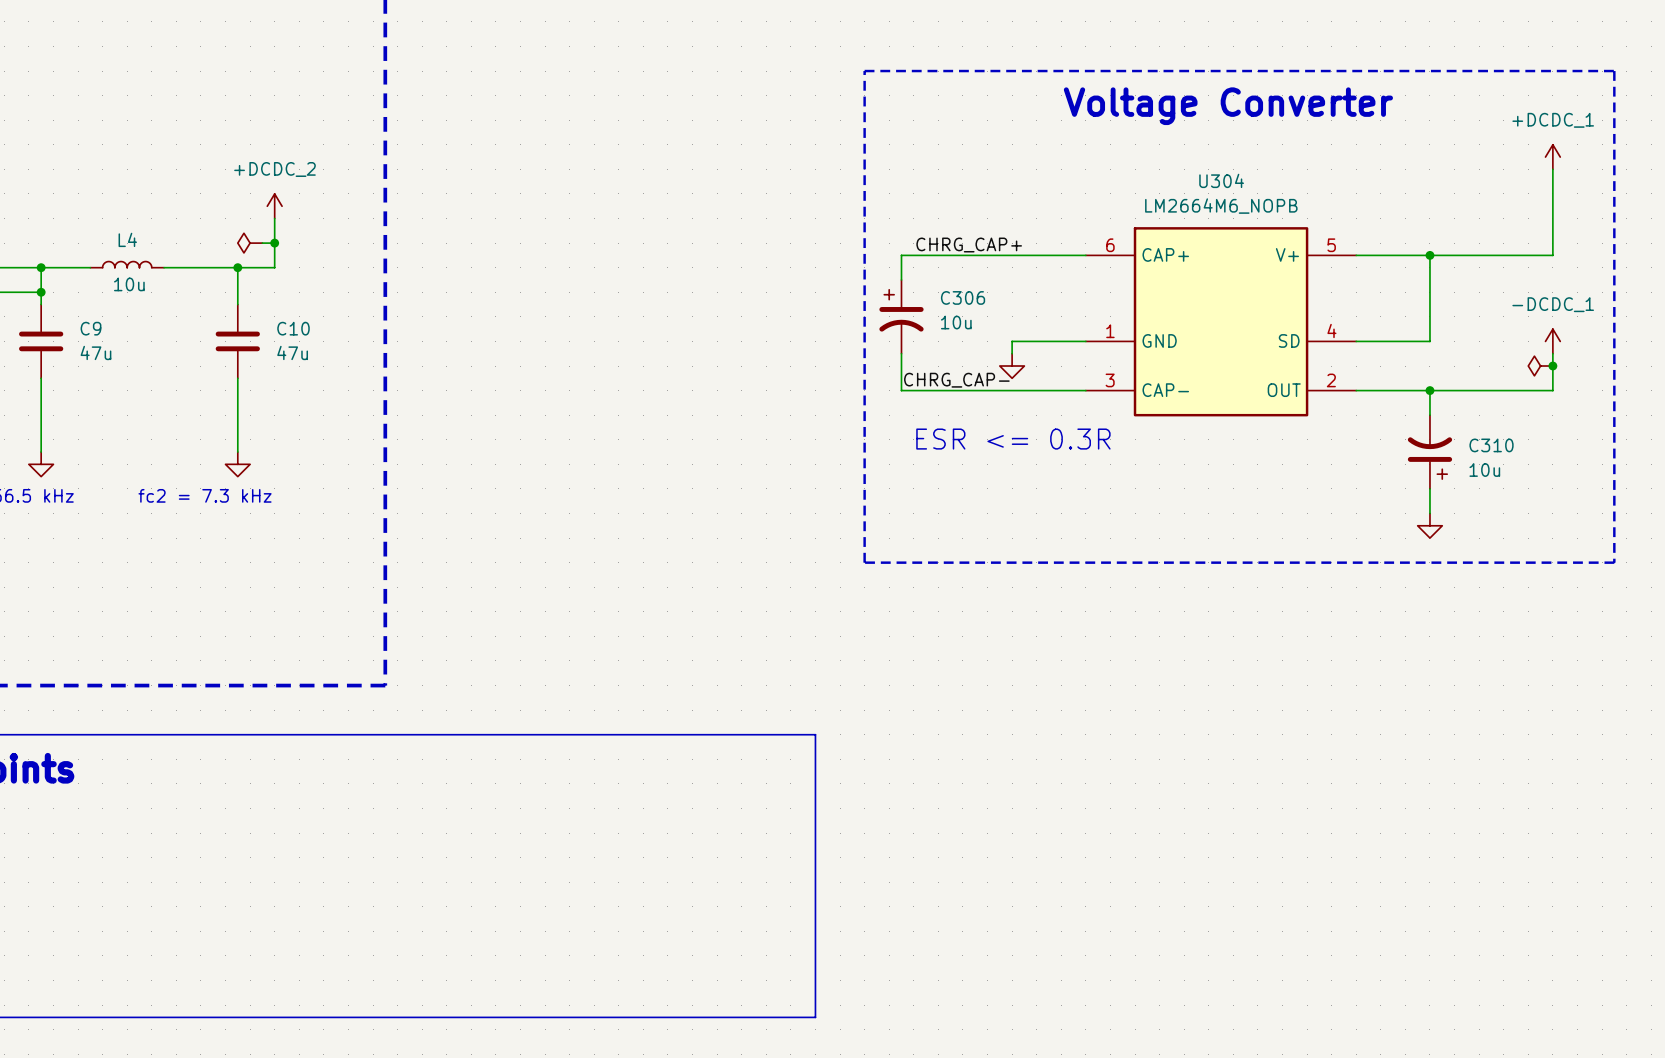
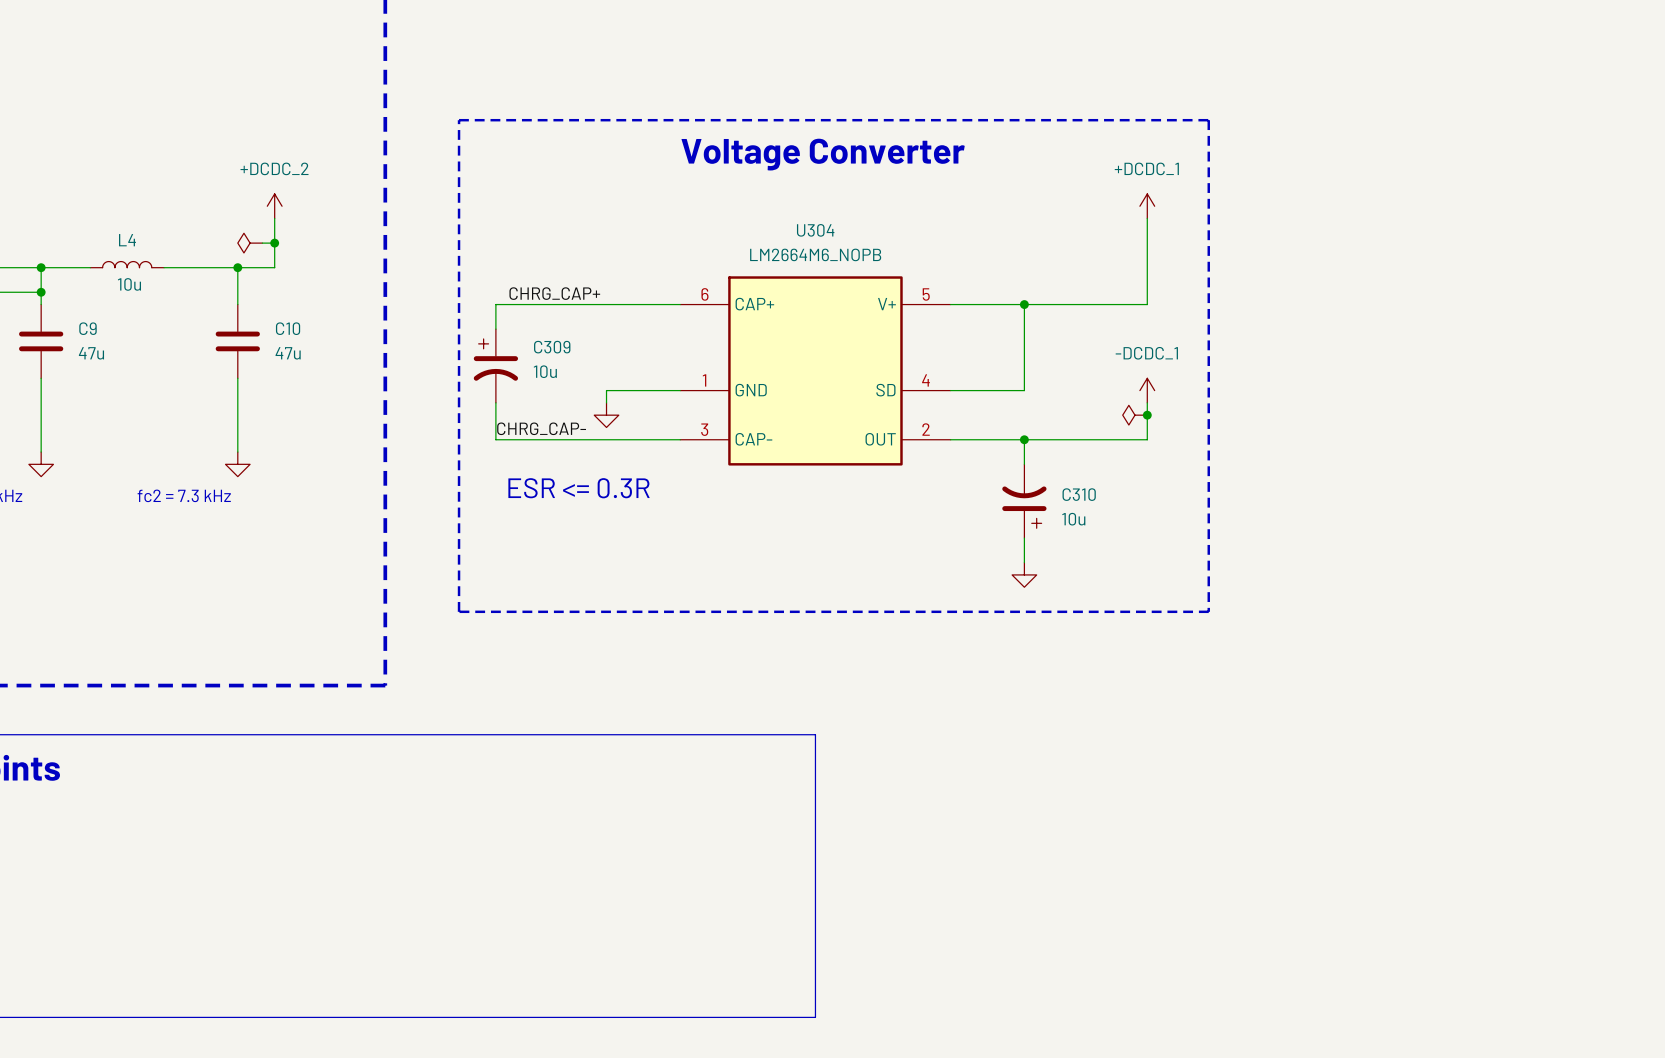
line: (864, 71) (1614, 71) (1614, 562) (864, 562) (864, 71) -> none
text: Voltage Converter (1228, 106) -> none
line: none -> (459, 120) (1208, 120) (1208, 611) (459, 611) (459, 120)
text: none -> Voltage Converter (823, 154)
power symbol: +DCDC_1 (1552, 157) -> none
wire: (1552, 169) (1552, 255) (1356, 255) -> none
power symbol: none -> +DCDC_1 (1147, 206)
wire: none -> (1147, 218) (1147, 304) (950, 304)
label: CHRG_CAP+ (969, 245) -> none
wire: (1085, 255) (901, 255) (901, 279) -> none
wire: (1429, 255) (1429, 341) (1356, 341) -> none
junction: (1429, 255) -> none
label: none -> CHRG_CAP+ (554, 293)
wire: none -> (680, 304) (495, 304) (495, 329)
junction: none -> (1024, 304)
C306: 10u (901, 316) -> none
U304 position: (1221, 321) -> (815, 370)
wire: (1085, 341) (1012, 341) (1012, 353) -> none
power symbol: -DCDC_1 (1552, 341) -> none
wire: (1552, 353) (1552, 390) (1356, 390) -> none
C309: none -> 10u (495, 366)
power symbol: (1012, 366) -> none
power symbol: (1540, 366) -> none
junction: (1552, 366) -> none
label: CHRG_CAP- (956, 380) -> none
wire: none -> (680, 390) (606, 390) (606, 402)
wire: (1024, 390) (1085, 390) -> (1024, 390) (1024, 304)
power symbol: none -> -DCDC_1 (1147, 390)
wire: (1429, 390) (1429, 415) -> none
junction: (1429, 390) -> none
wire: none -> (495, 402) (495, 439) (680, 439)
wire: none -> (1147, 402) (1147, 439) (950, 439)
power symbol: none -> (606, 415)
power symbol: none -> (1135, 415)
junction: none -> (1147, 415)
label: none -> CHRG_CAP- (541, 428)
text: ESR <= 0.3R (1013, 439) -> none
wire: none -> (1024, 439) (1024, 464)
junction: none -> (1024, 439)
C310 position: (1429, 452) -> (1024, 501)
text: none -> ESR <= 0.3R (579, 488)
wire: (1429, 488) (1429, 513) -> none
power symbol: (1429, 525) -> none
wire: none -> (1024, 538) (1024, 562)
power symbol: none -> (1024, 574)

